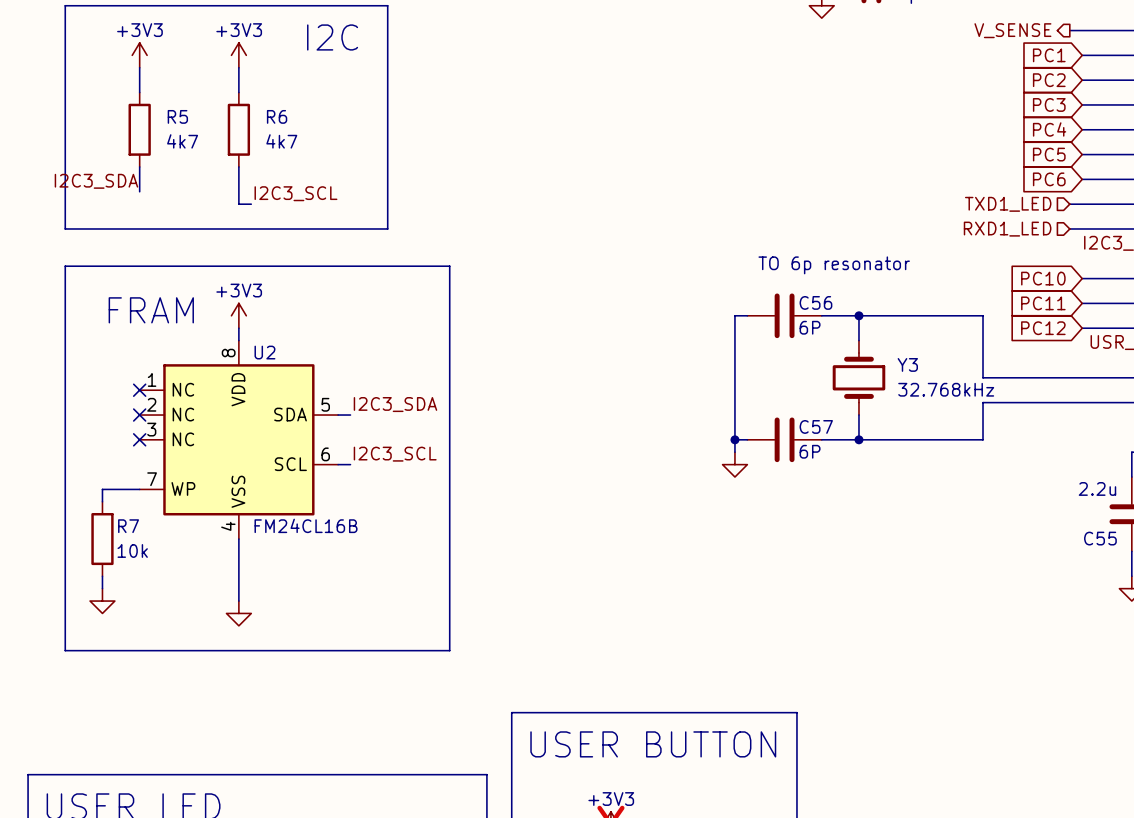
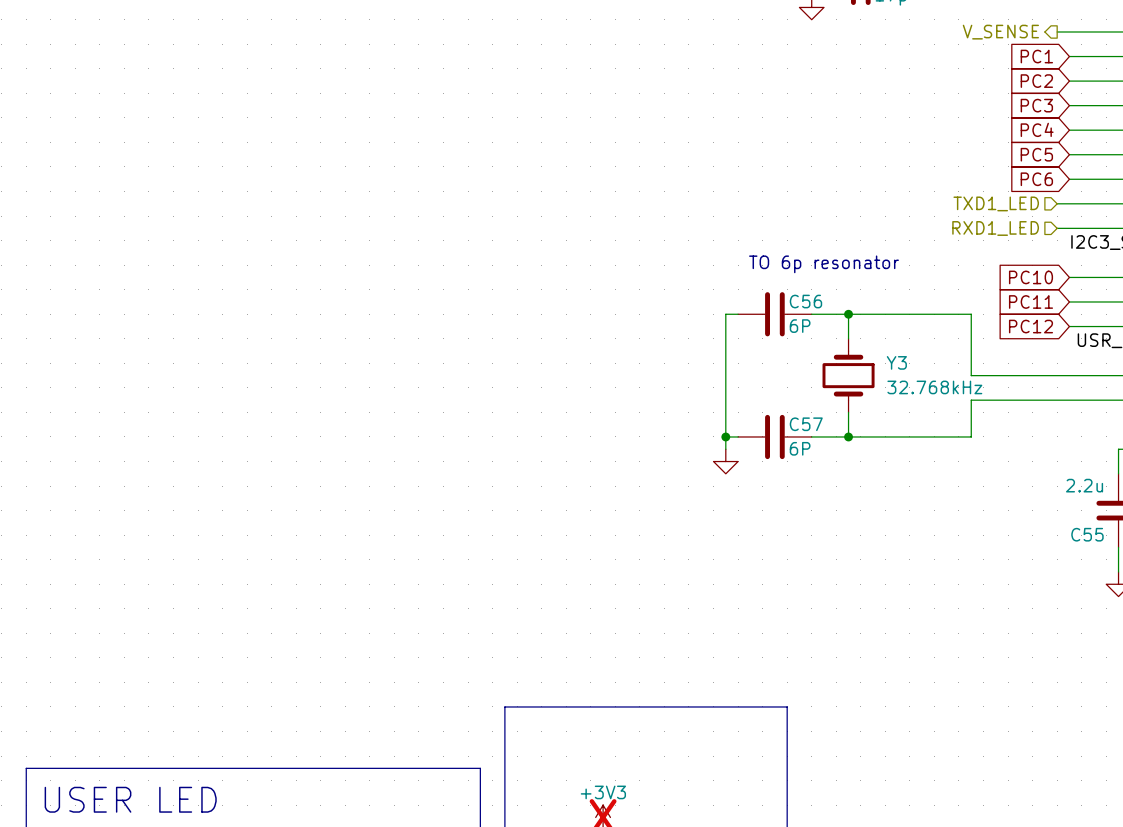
line: (65, 5) (65, 228) (387, 228) (387, 5) (65, 5) -> none
text: I2C (332, 37) -> none
power symbol: +3V3 (139, 55) -> none
power symbol: +3V3 (238, 55) -> none
wire: (139, 67) (139, 92) -> none
wire: (238, 67) (238, 92) -> none
R5: 4k7 (139, 129) -> none
R6: 4k7 (238, 129) -> none
wire: (139, 166) (139, 191) -> none
wire: (238, 166) (238, 204) (251, 204) -> none
label: I2C3_SDA (96, 181) -> none
label: I2C3_SCL (295, 193) -> none
line: (65, 266) (65, 650) (449, 650) (449, 266) (65, 266) -> none
text: FRAM (151, 310) -> none
power symbol: +3V3 (238, 315) -> none
wire: (238, 328) (238, 340) -> none
no-connect mark: (139, 390) -> none
label: I2C3_SDA (395, 404) -> none
no-connect mark: (139, 415) -> none
wire: (338, 415) (350, 415) -> none
no-connect mark: (139, 439) -> none
U2: FM24CL16B (238, 439) -> none
label: I2C3_SCL (395, 454) -> none
wire: (338, 464) (350, 464) -> none
wire: (139, 489) (102, 489) (102, 501) -> none
R7: 10k (102, 539) -> none
wire: (238, 539) (238, 601) -> none
wire: (102, 576) (102, 588) -> none
power symbol: (102, 601) -> none
power symbol: (238, 613) -> none
text: USER BUTTON (653, 744) -> none

